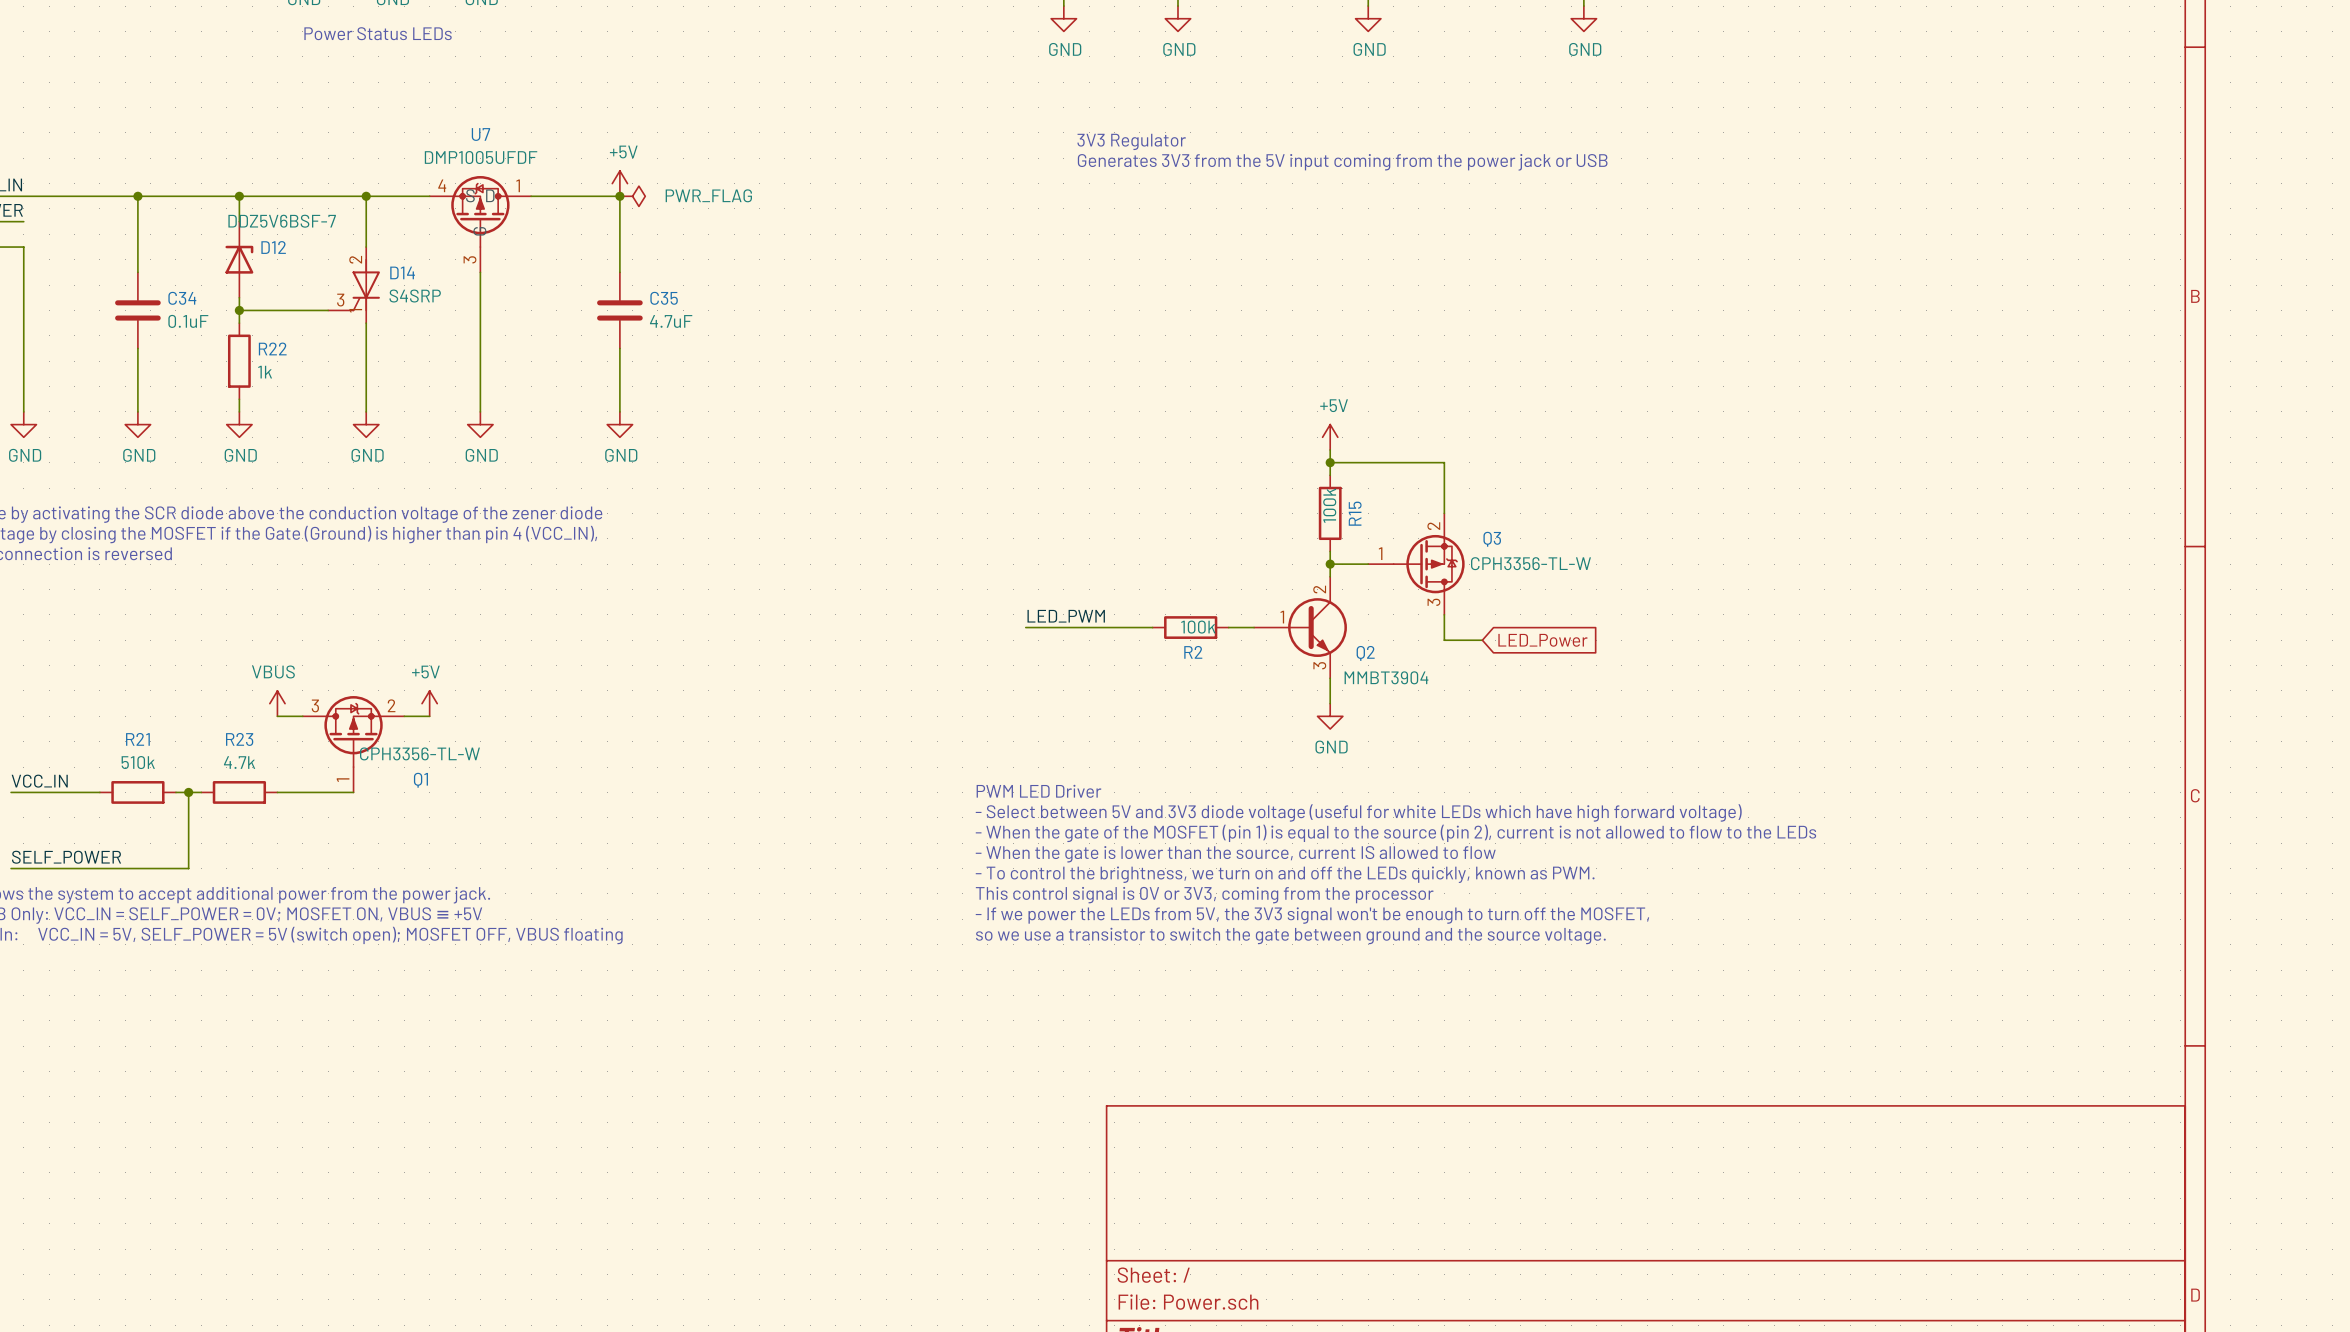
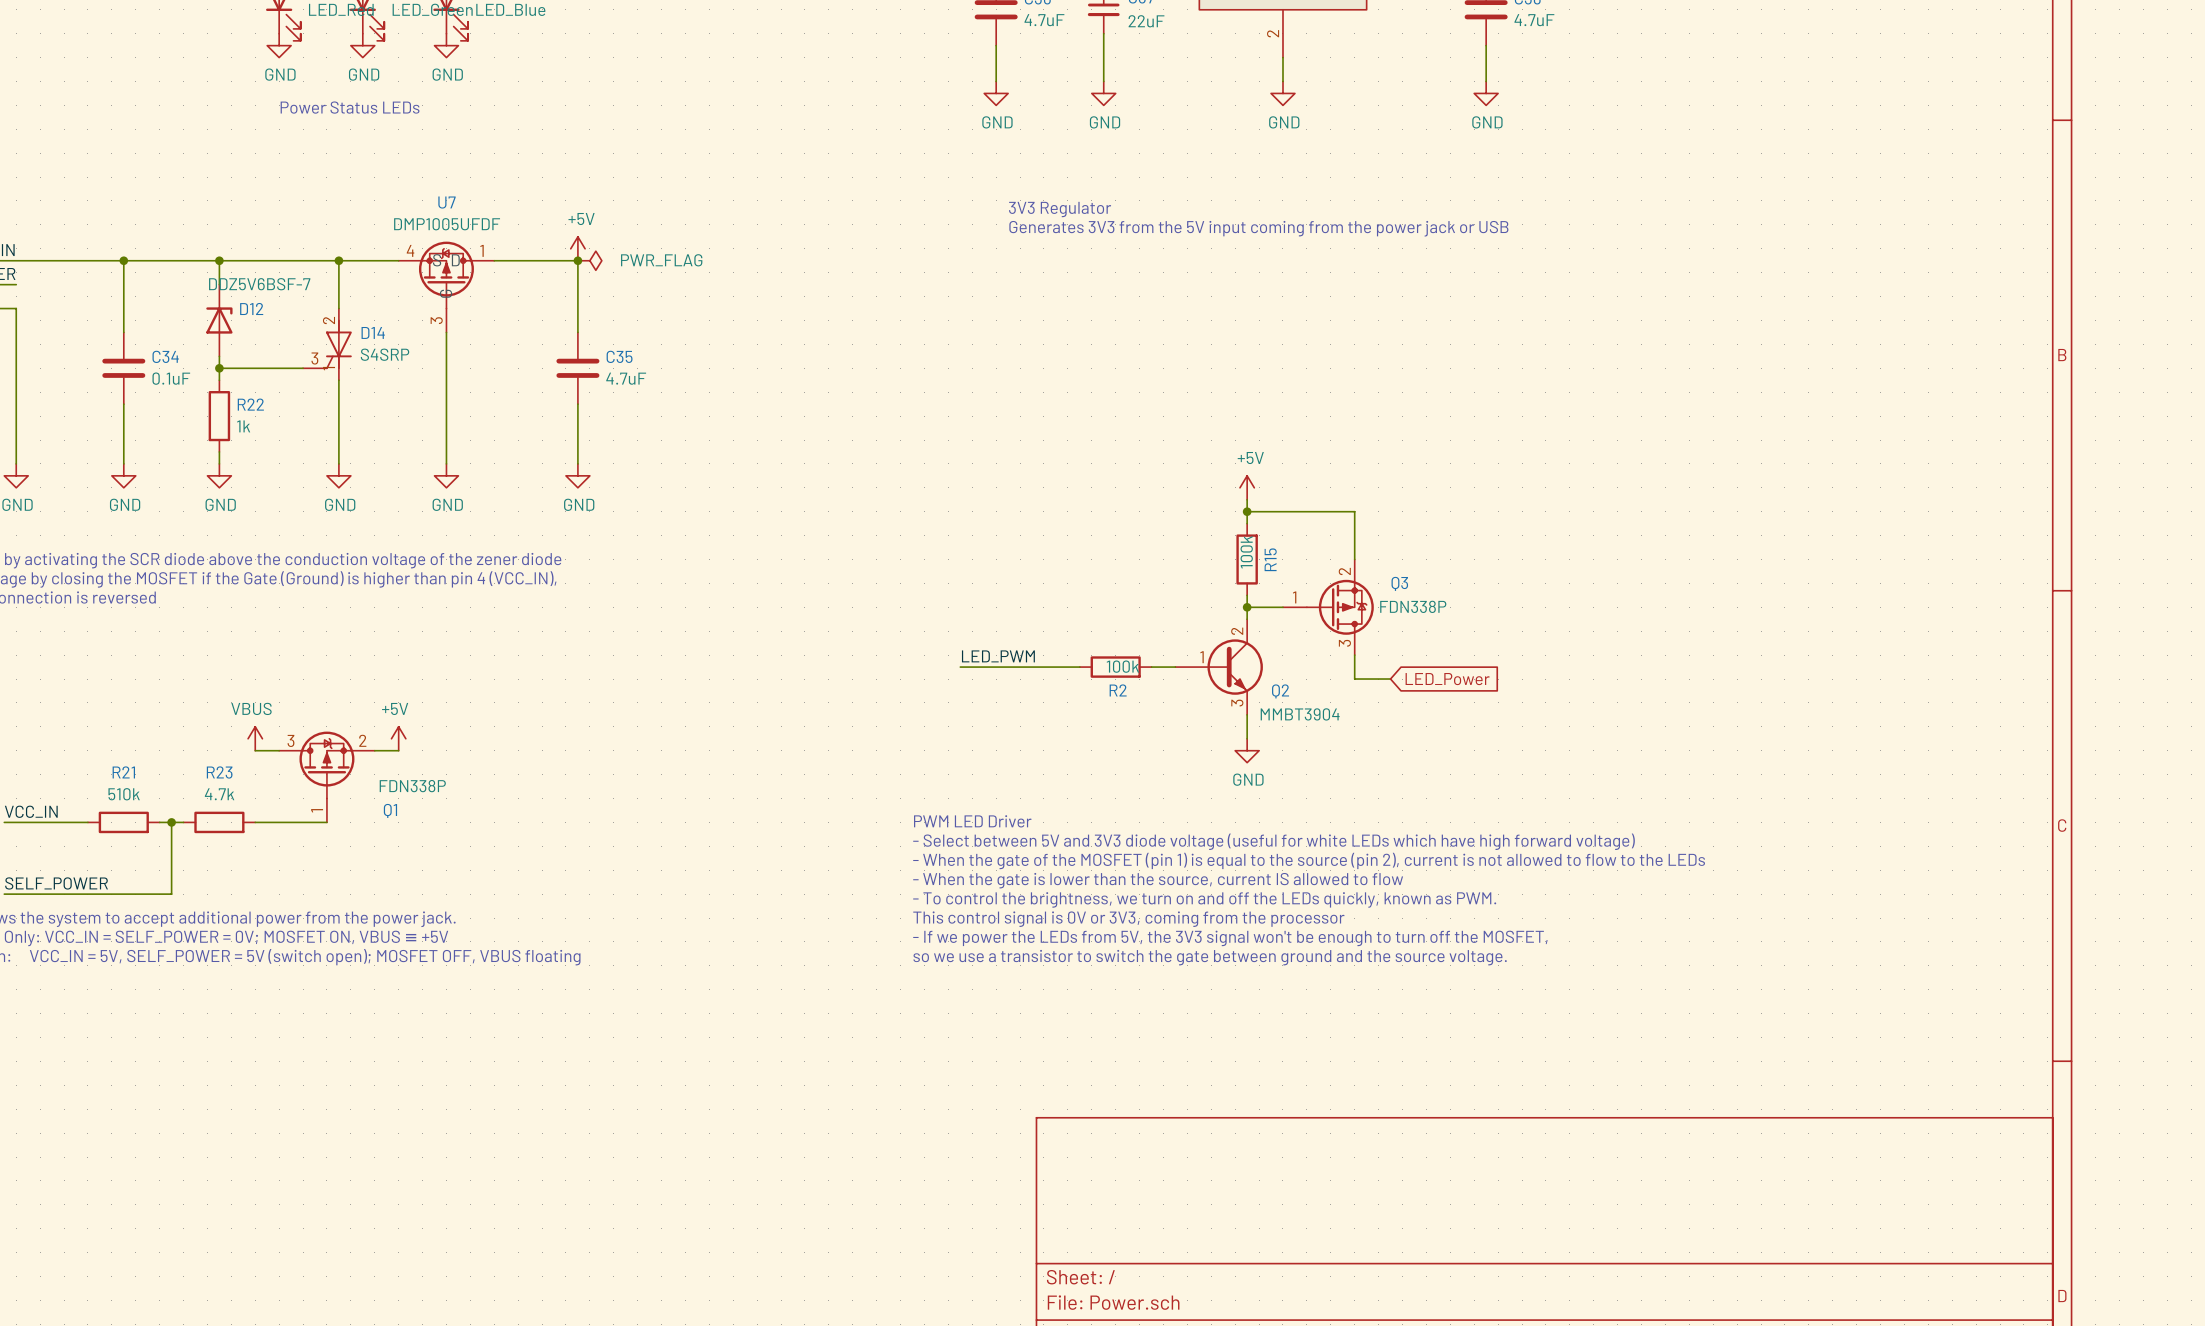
Q3 value: CPH3356-TL-W (1530, 563) -> FDN338P (1413, 606)
Q1 value: CPH3356-TL-W (419, 753) -> FDN338P (412, 786)

